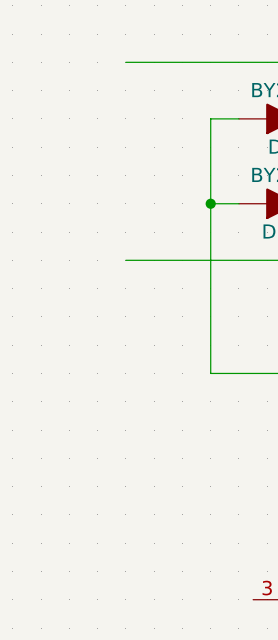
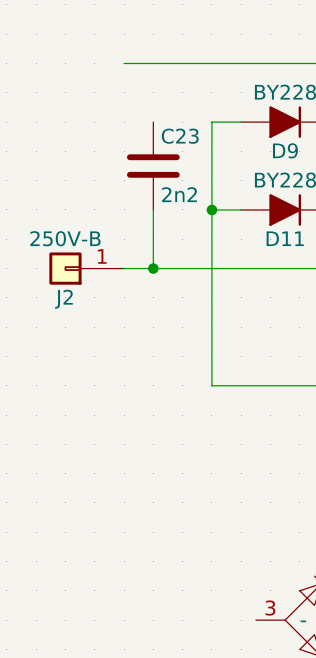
C23: none -> 2n2 (153, 166)
wire: none -> (153, 209) (153, 268)
J2: none -> 250V-B (86, 268)
junction: none -> (153, 268)

